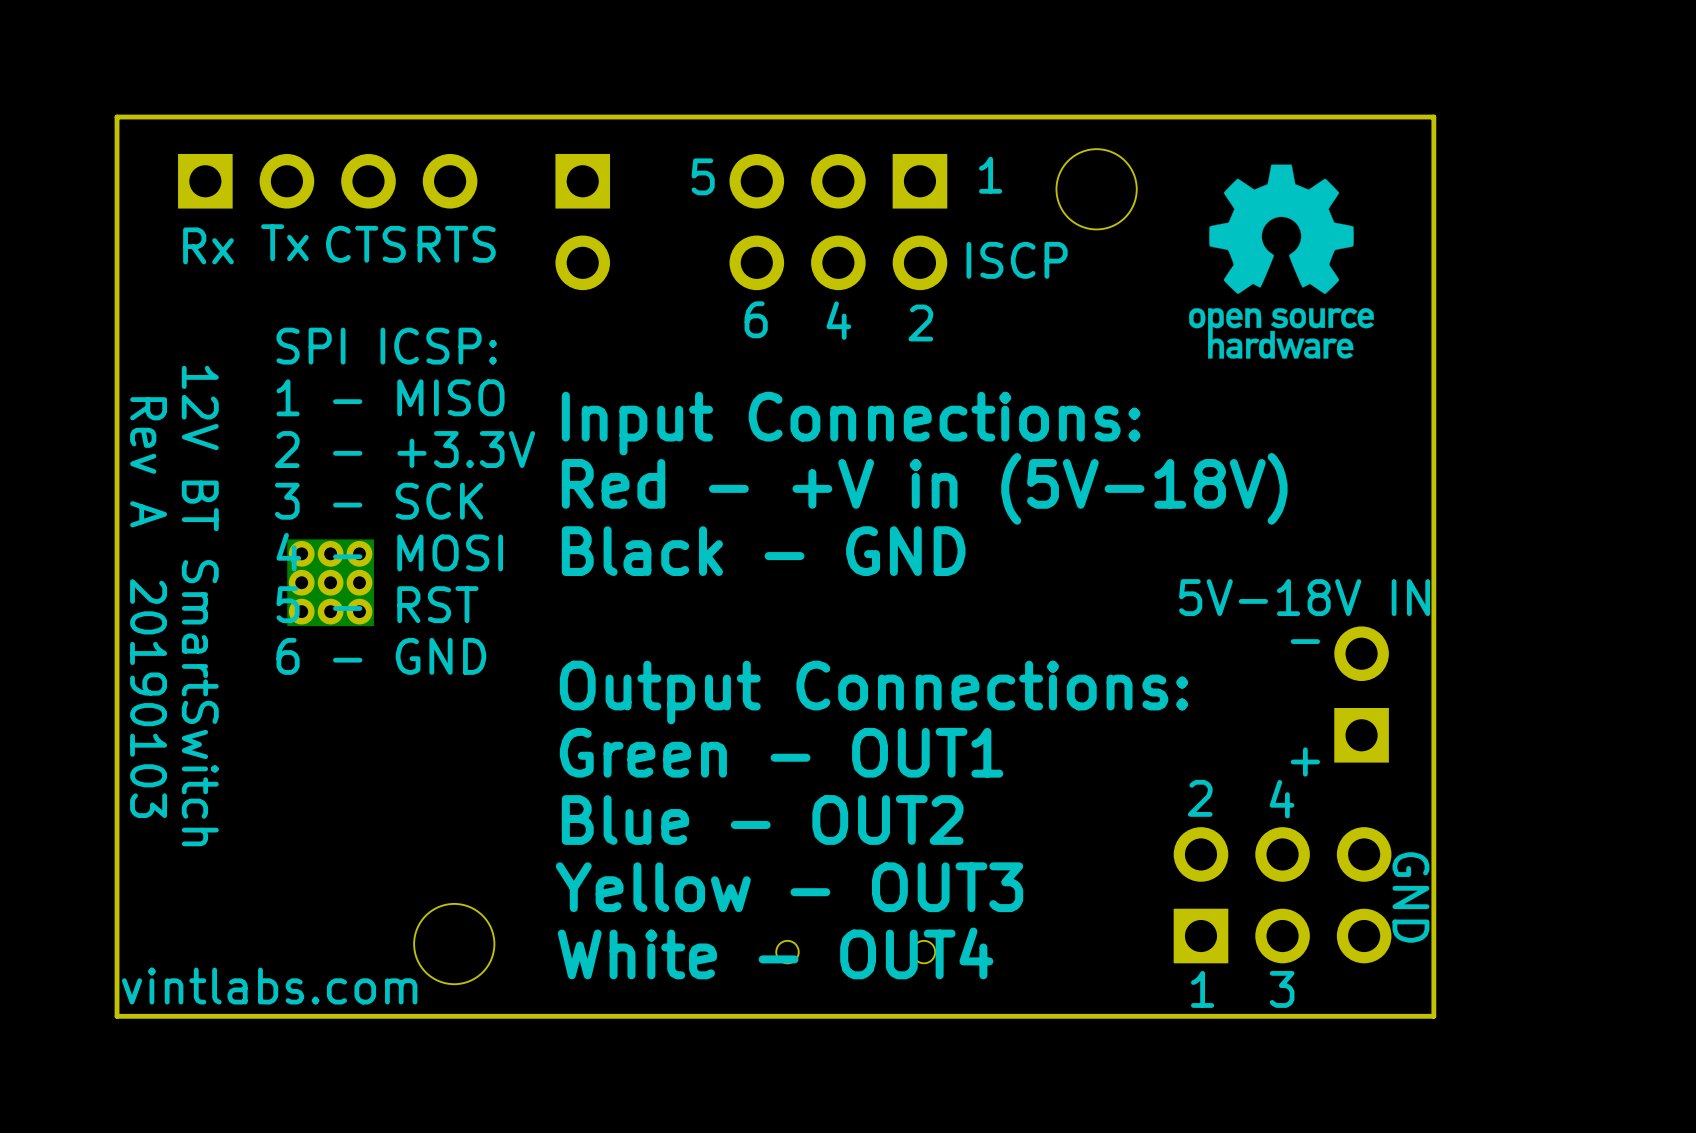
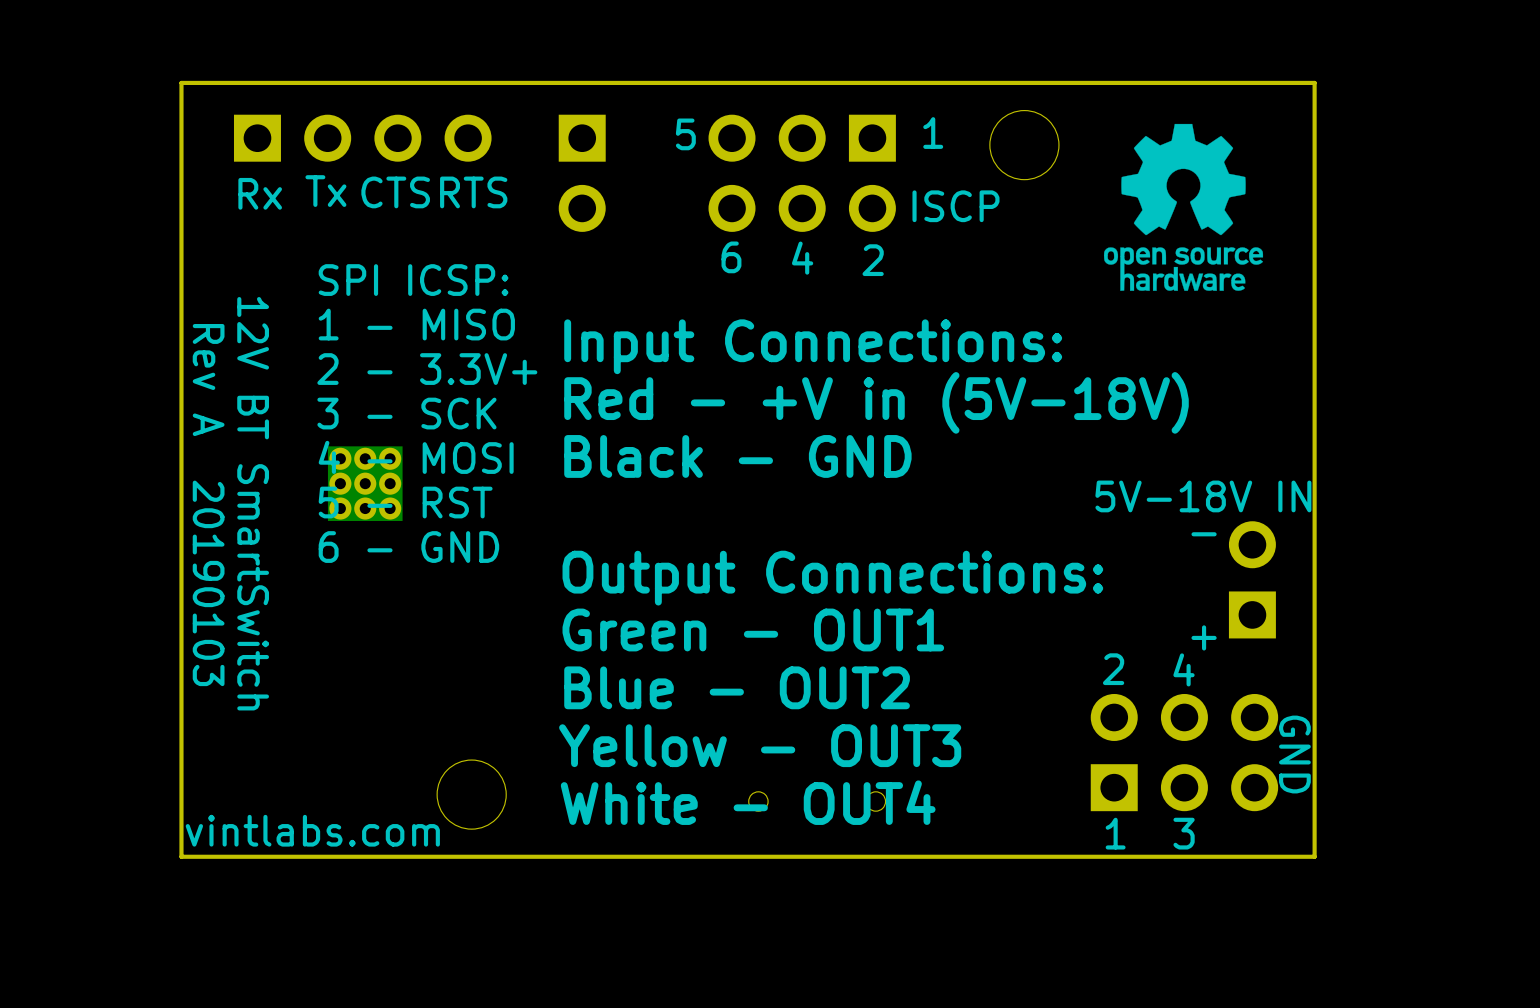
text: 2 - +3.3V (405, 449) -> 2 - 3.3V+ (427, 369)

